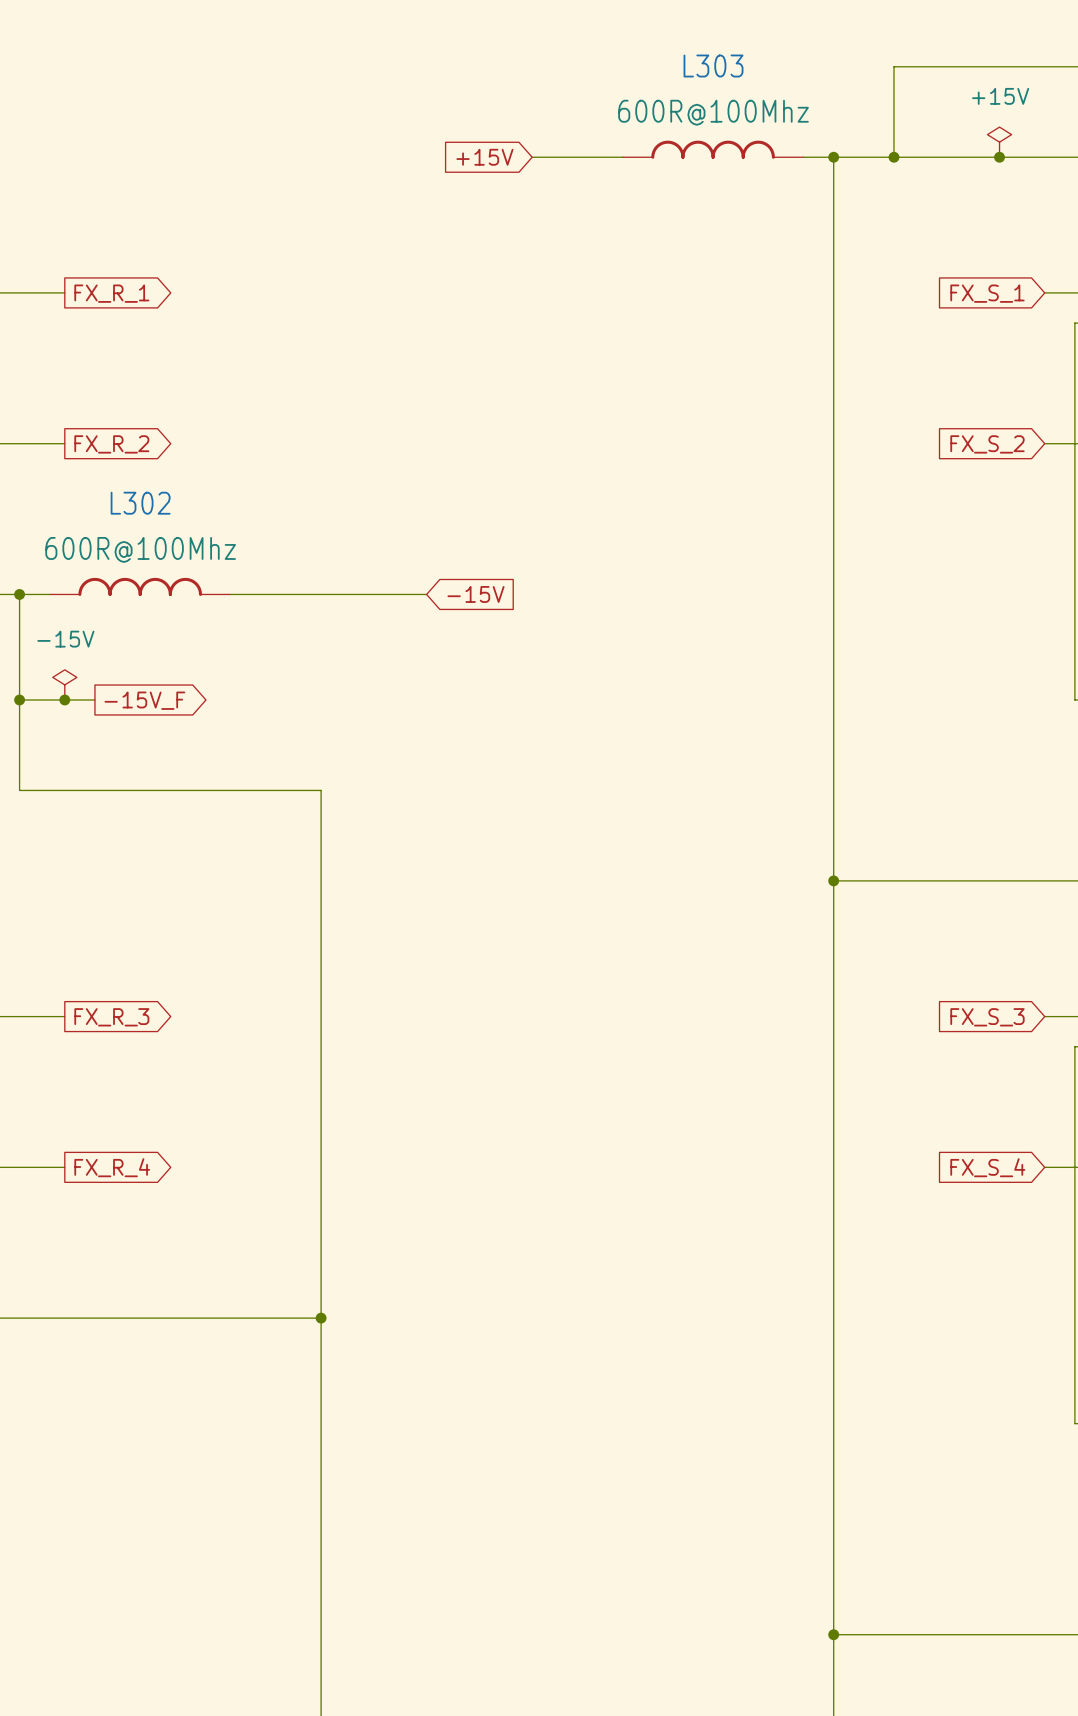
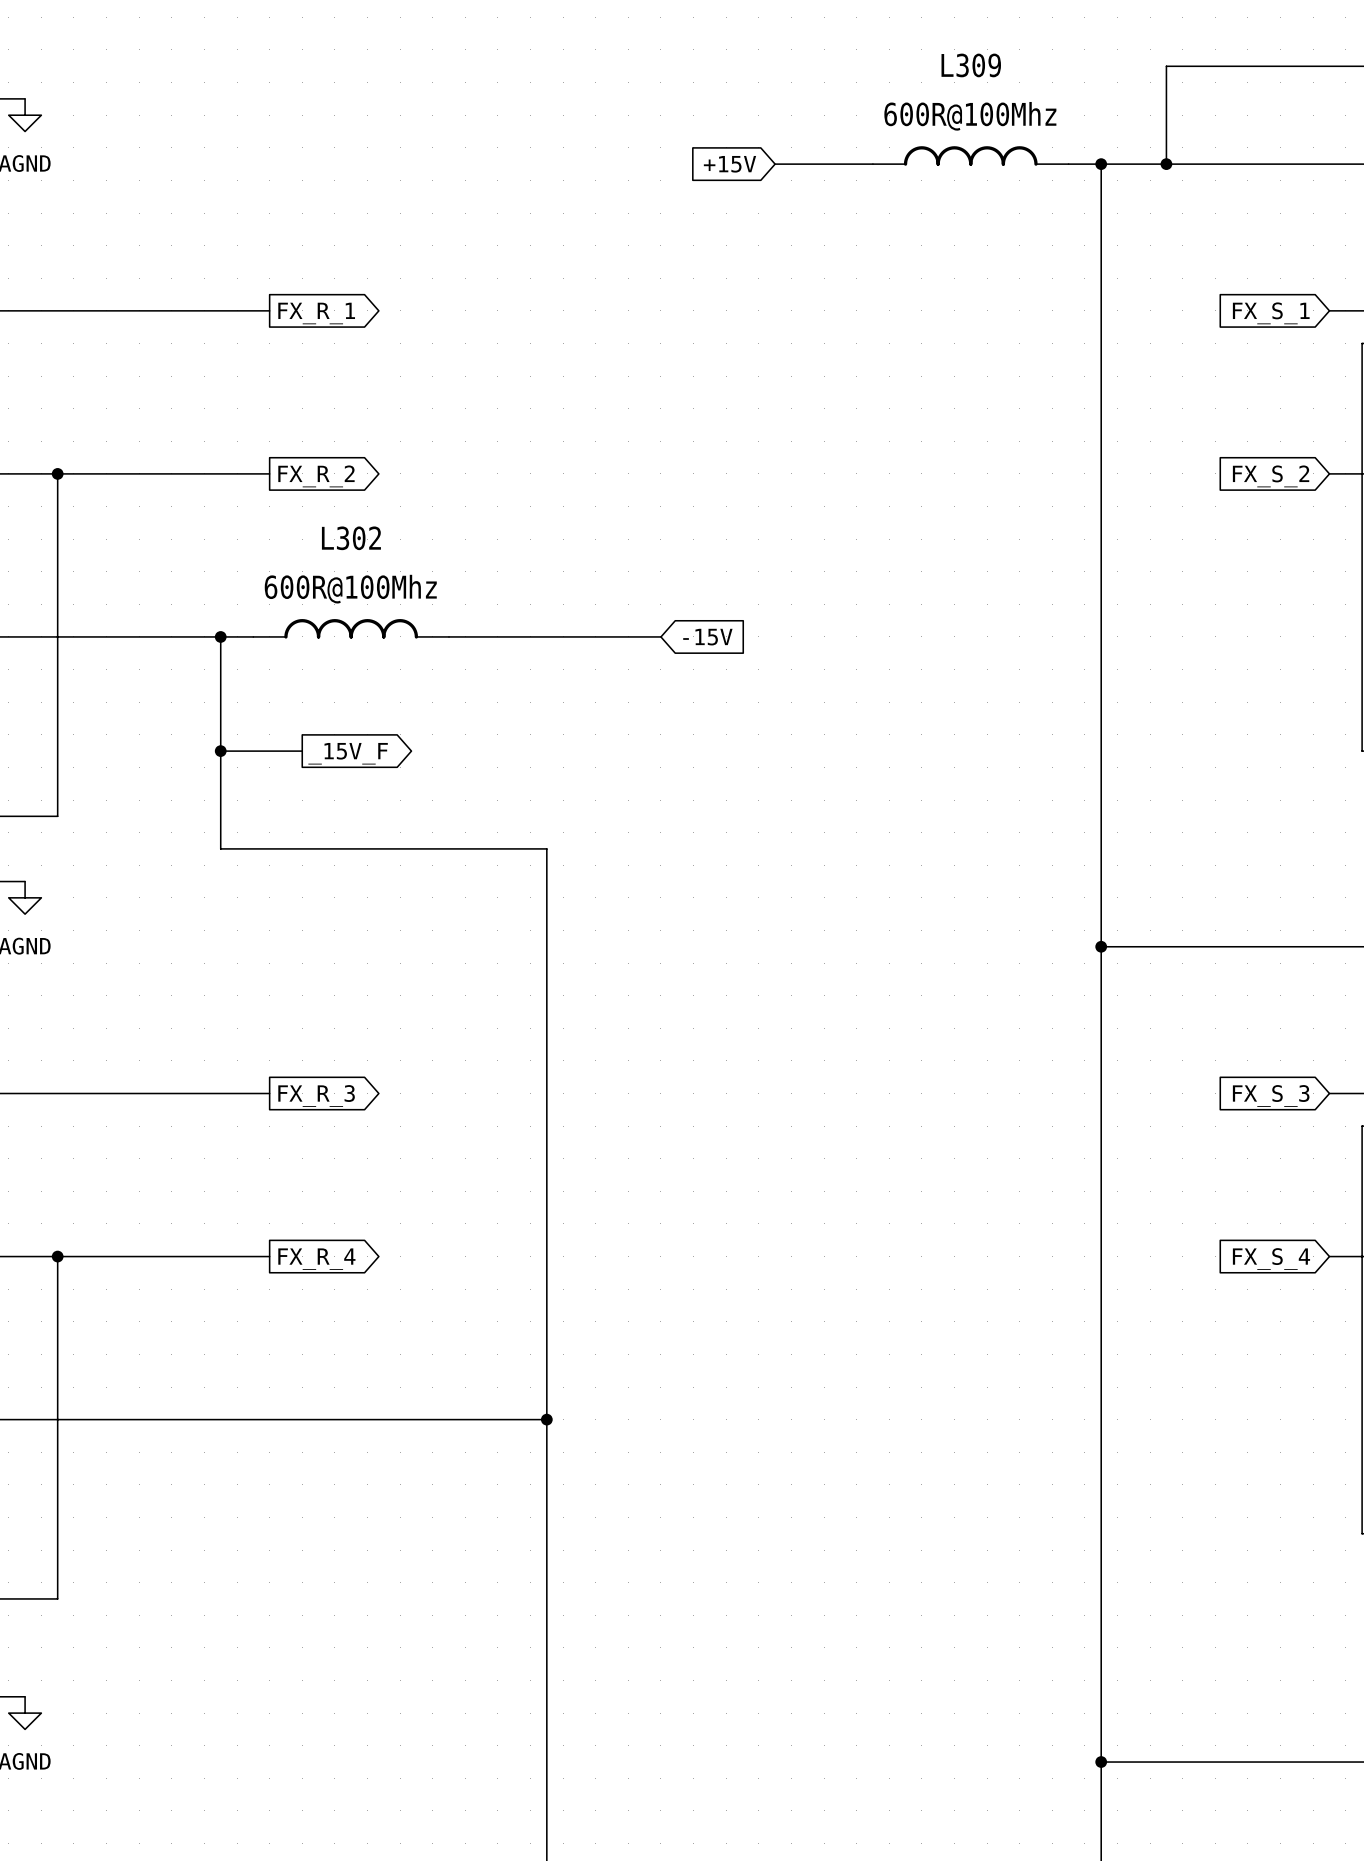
L303 name: L303 (713, 66) -> L309 (971, 65)
power symbol: +15V (999, 142) -> none
junction: (999, 157) -> none
power symbol: -15V (64, 684) -> none
junction: (64, 699) -> none
global label: -15V_F (144, 700) -> _15V_F (348, 753)

